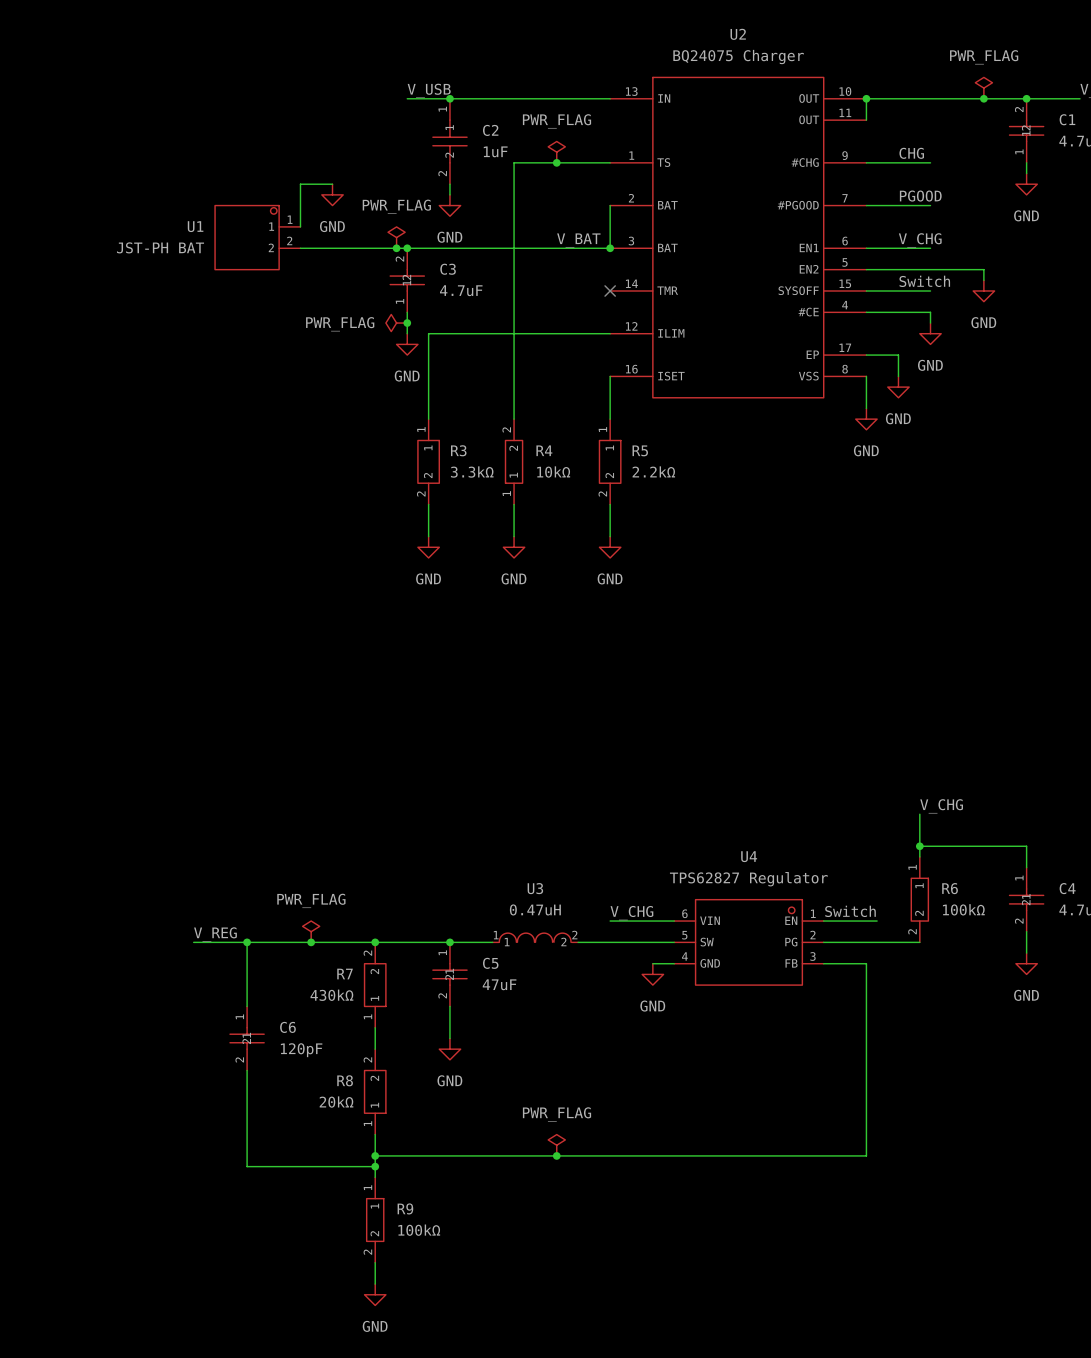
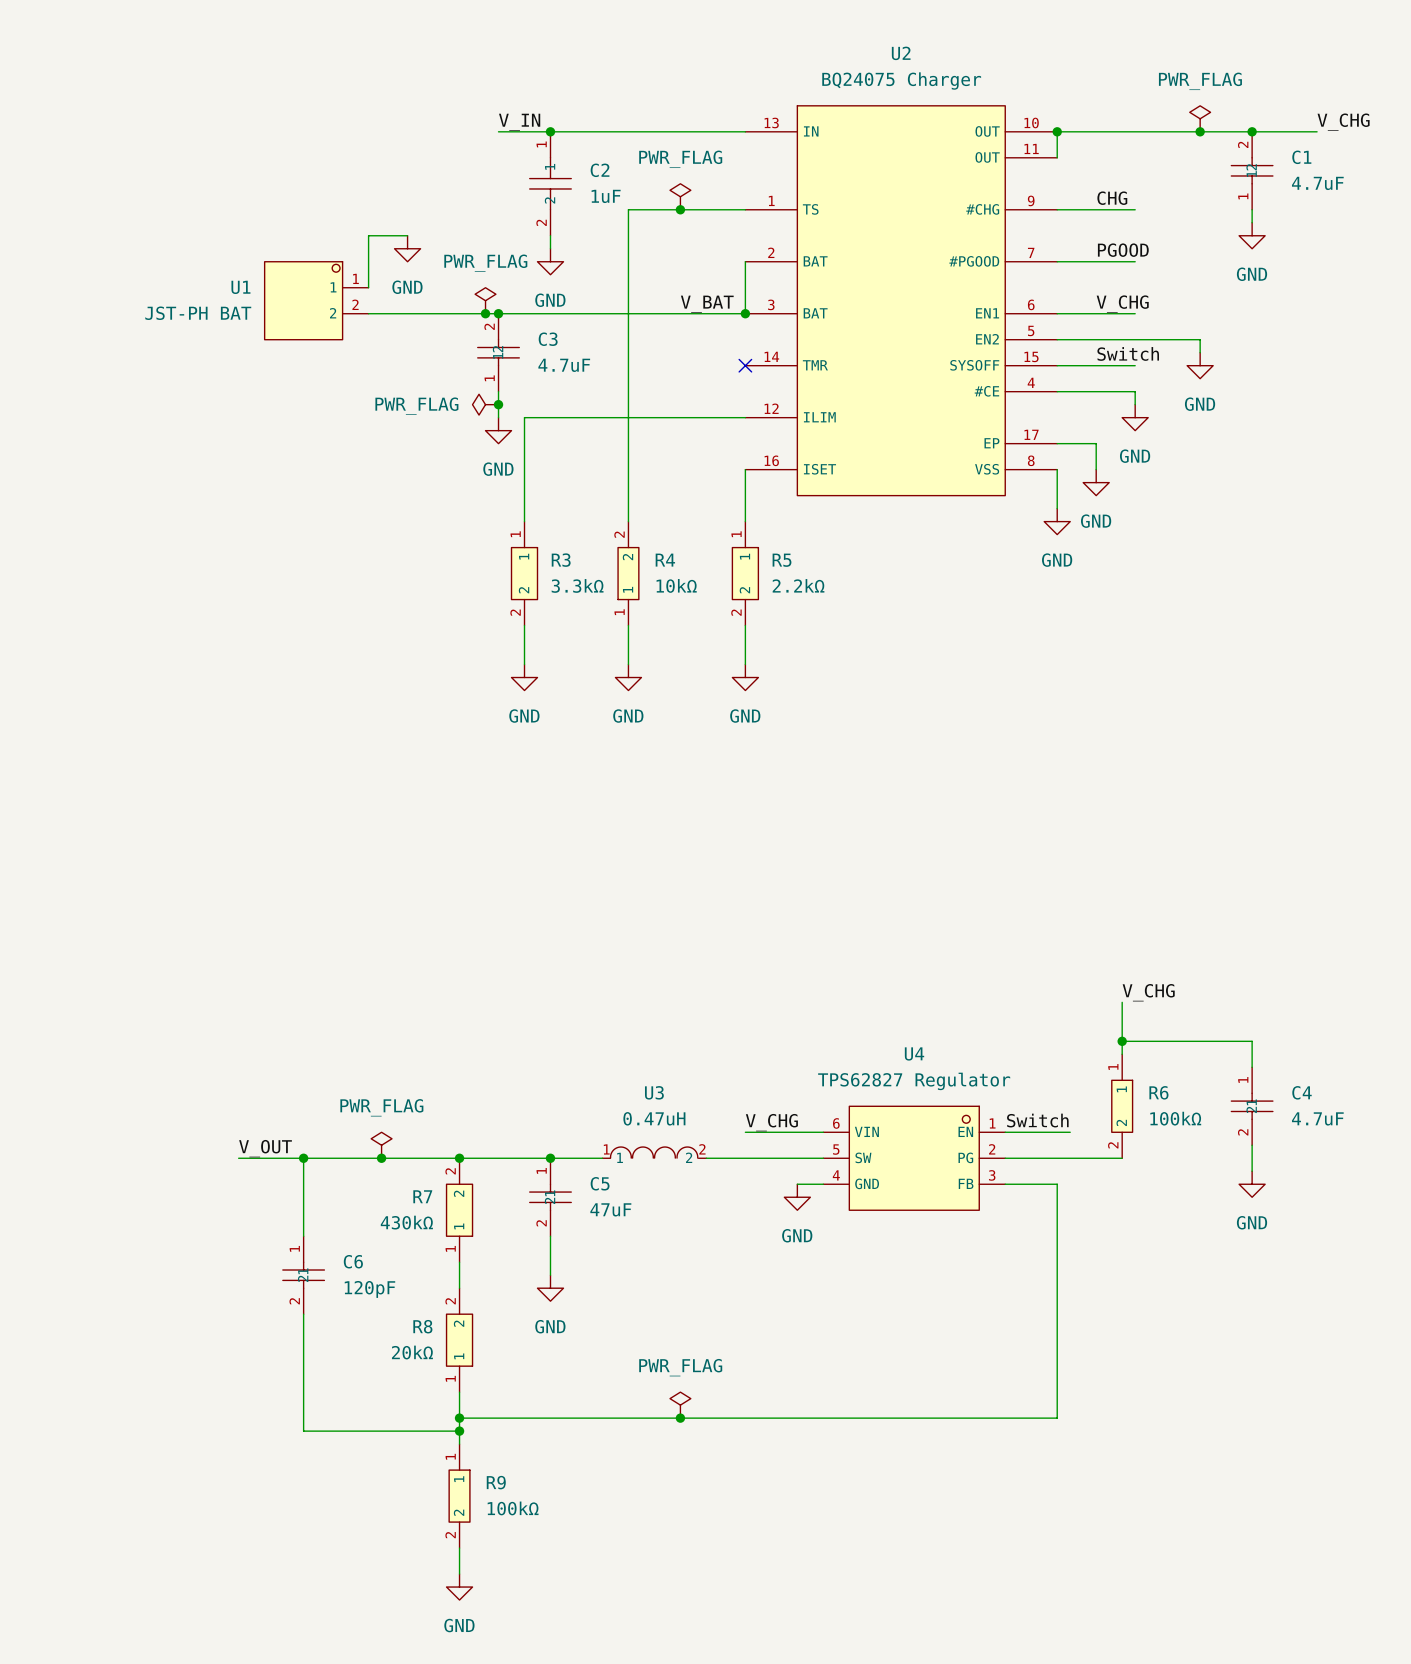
label: V_USB (429, 90) -> V_IN (519, 122)
label: V_REG (215, 934) -> V_OUT (265, 1148)

